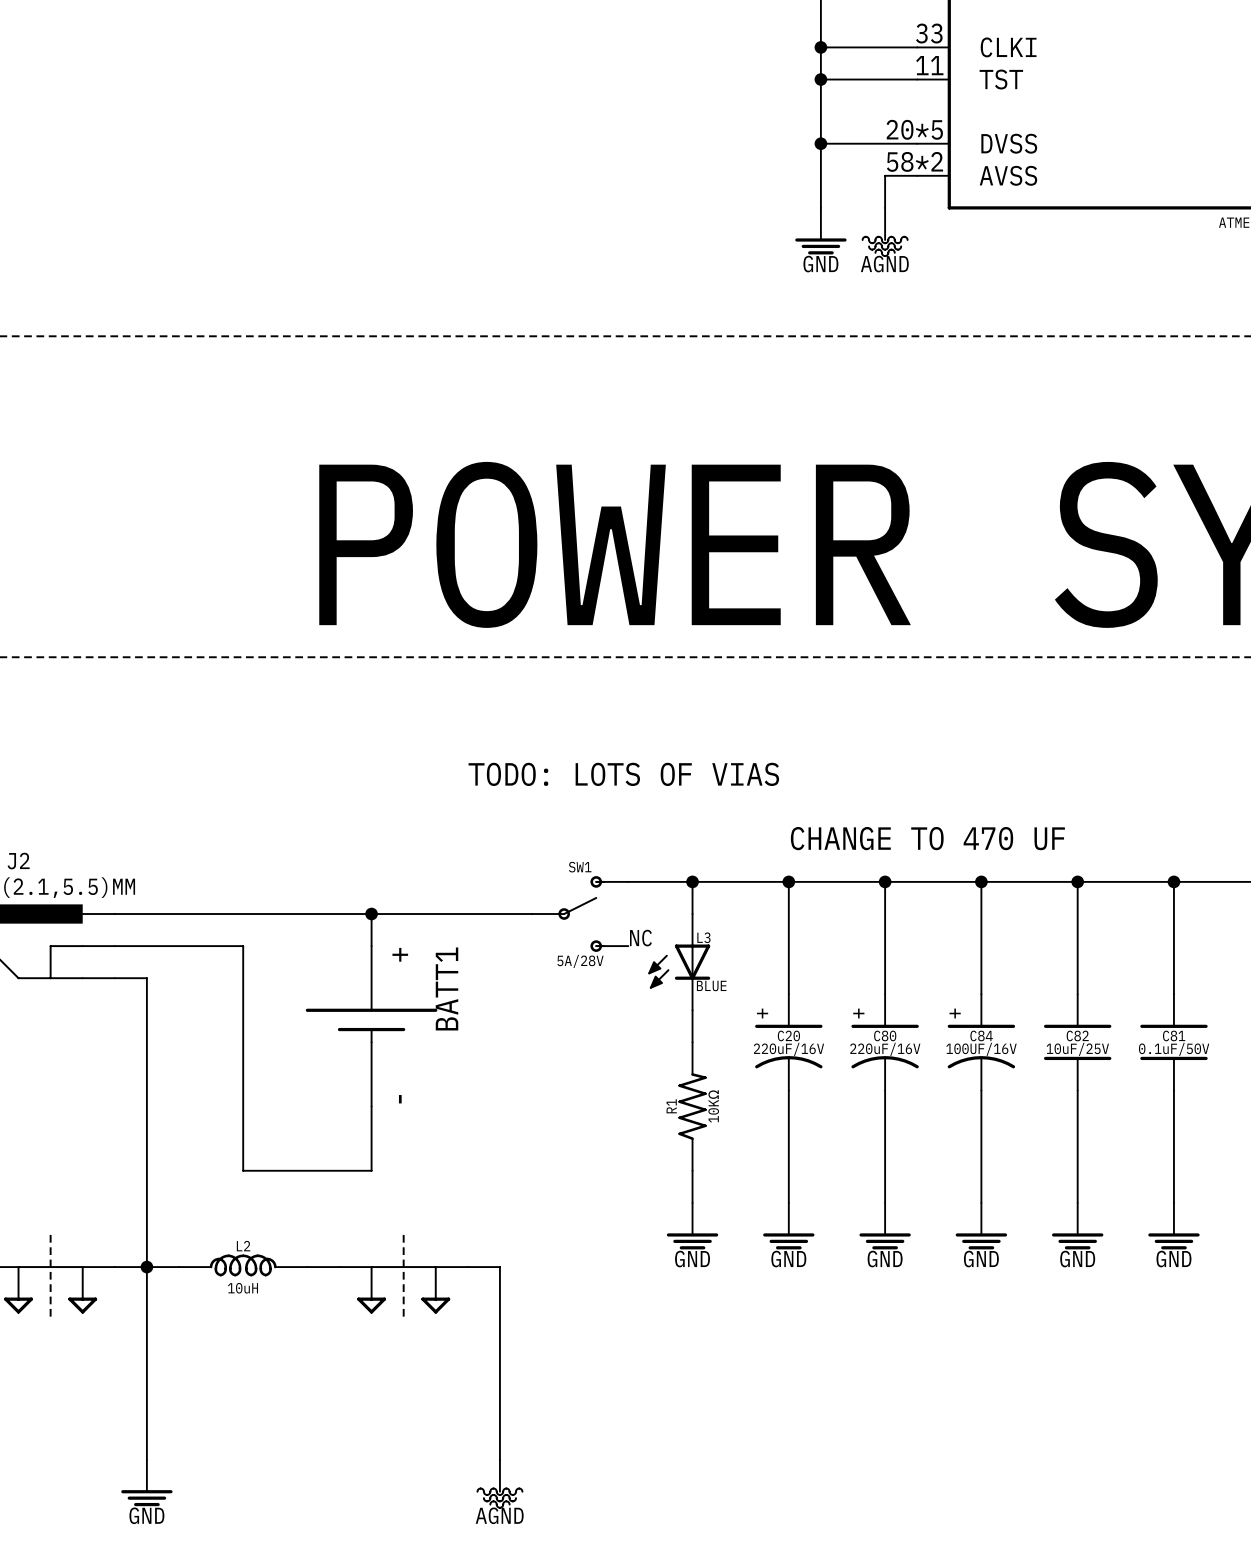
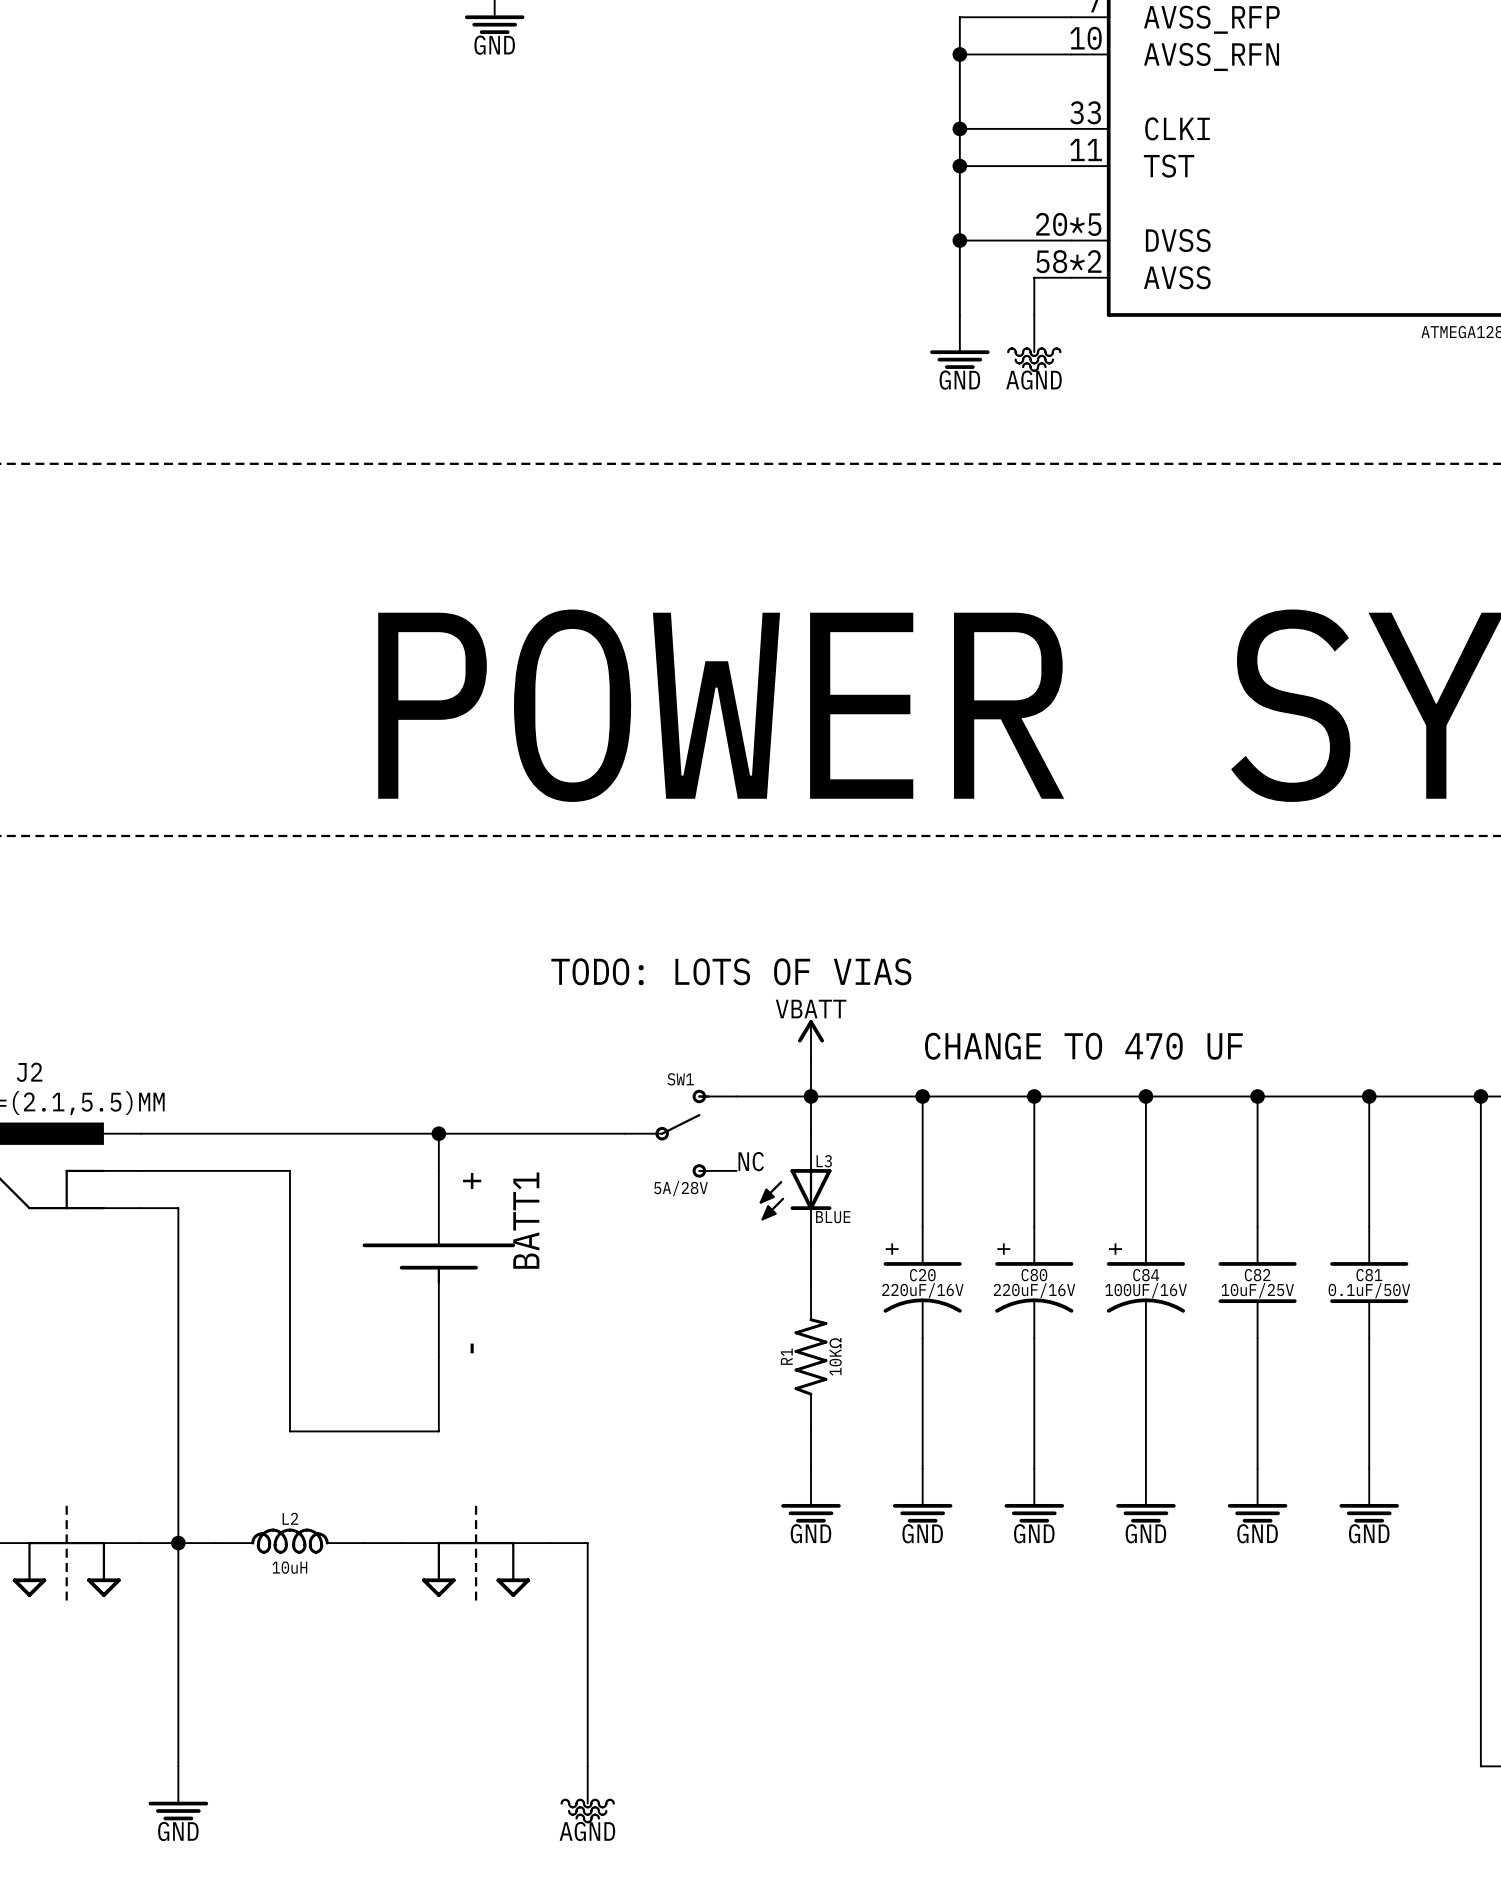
power symbol: none -> (811, 1039)
wire: none -> (811, 1059) (811, 1096)

